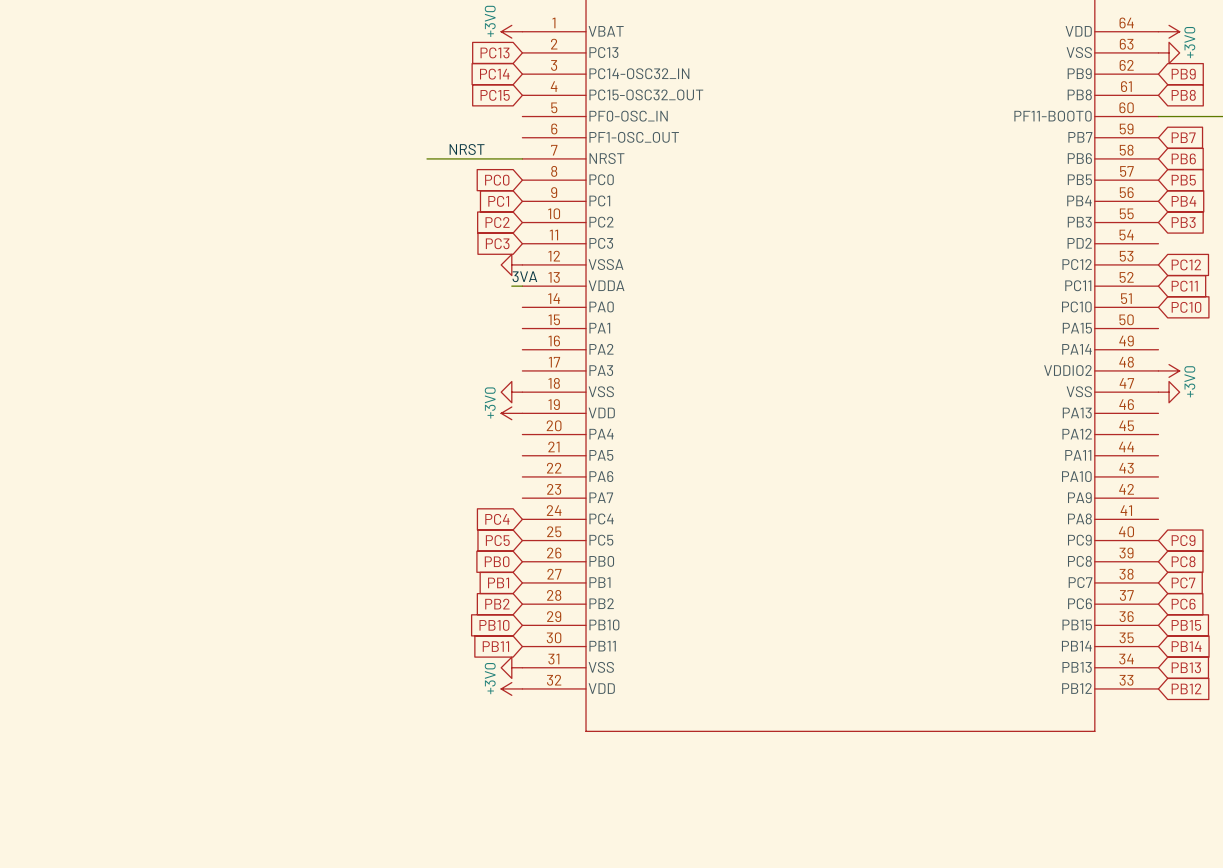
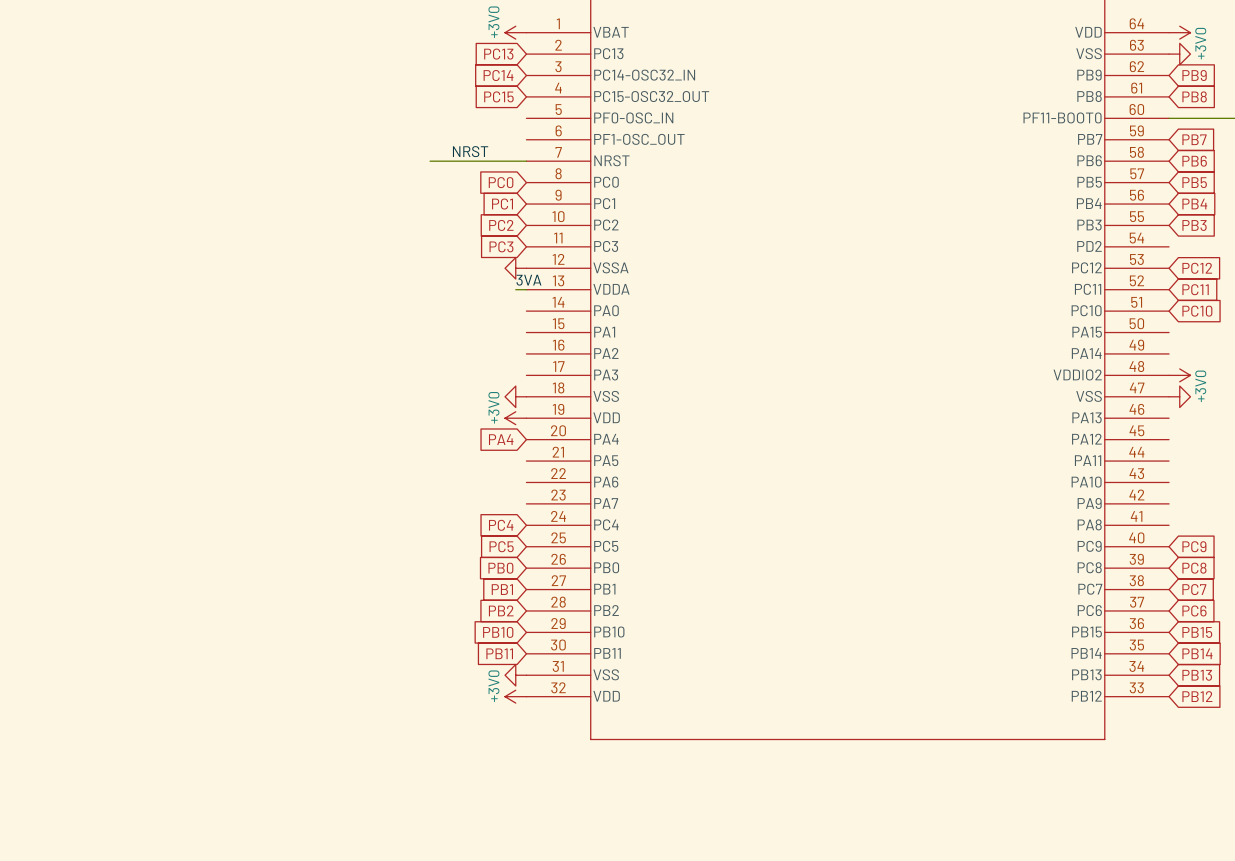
global label: none -> PA4 (501, 439)

